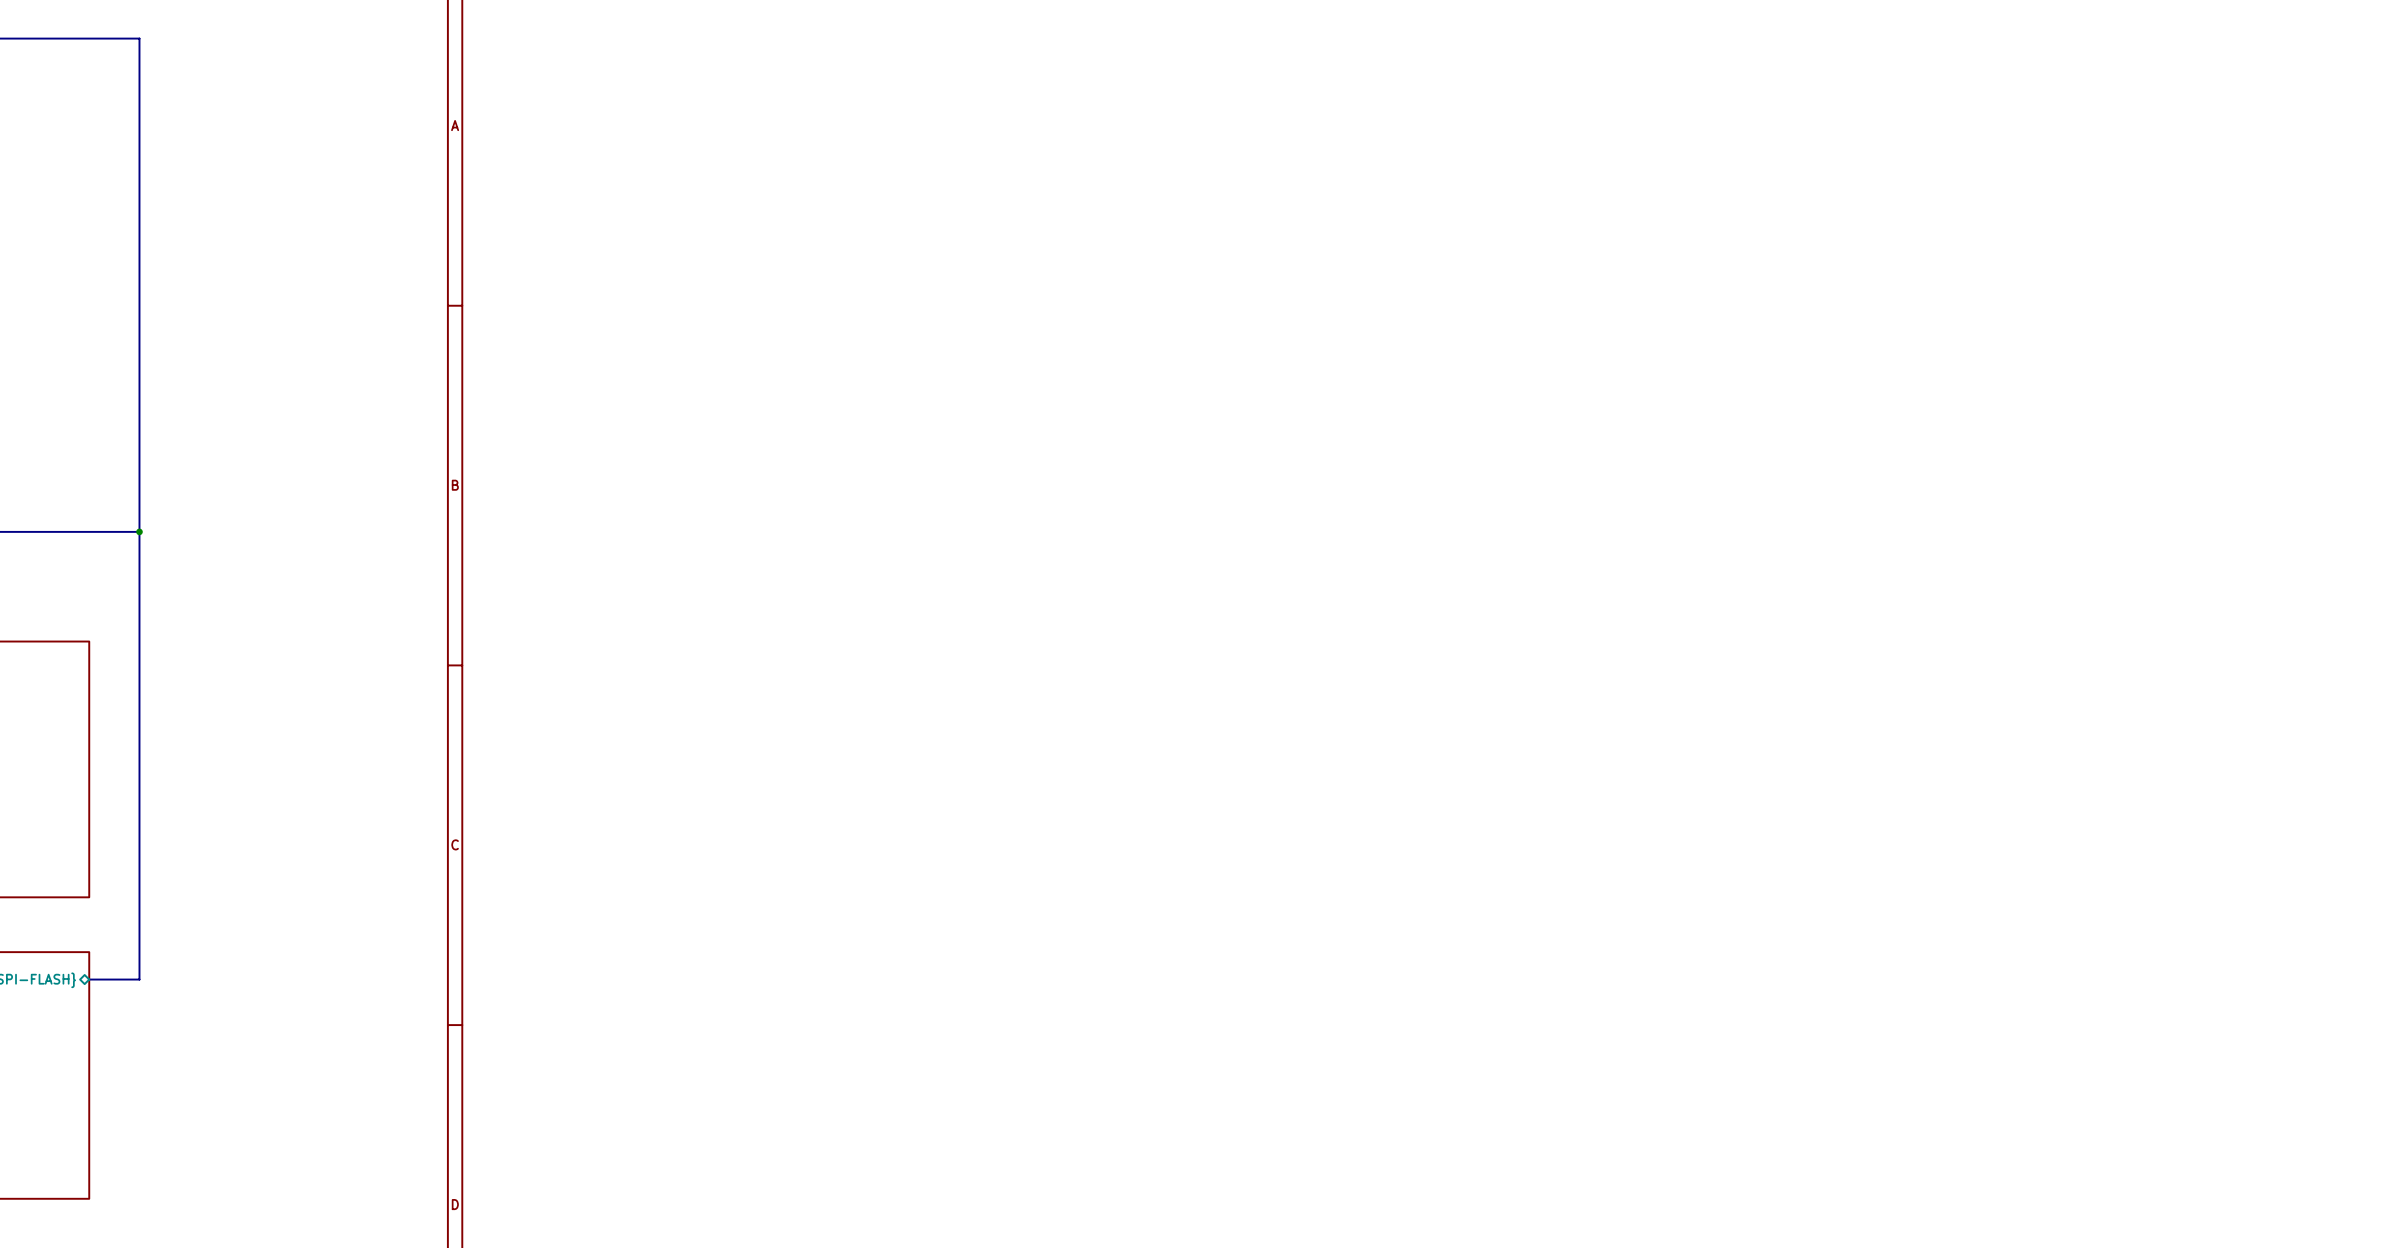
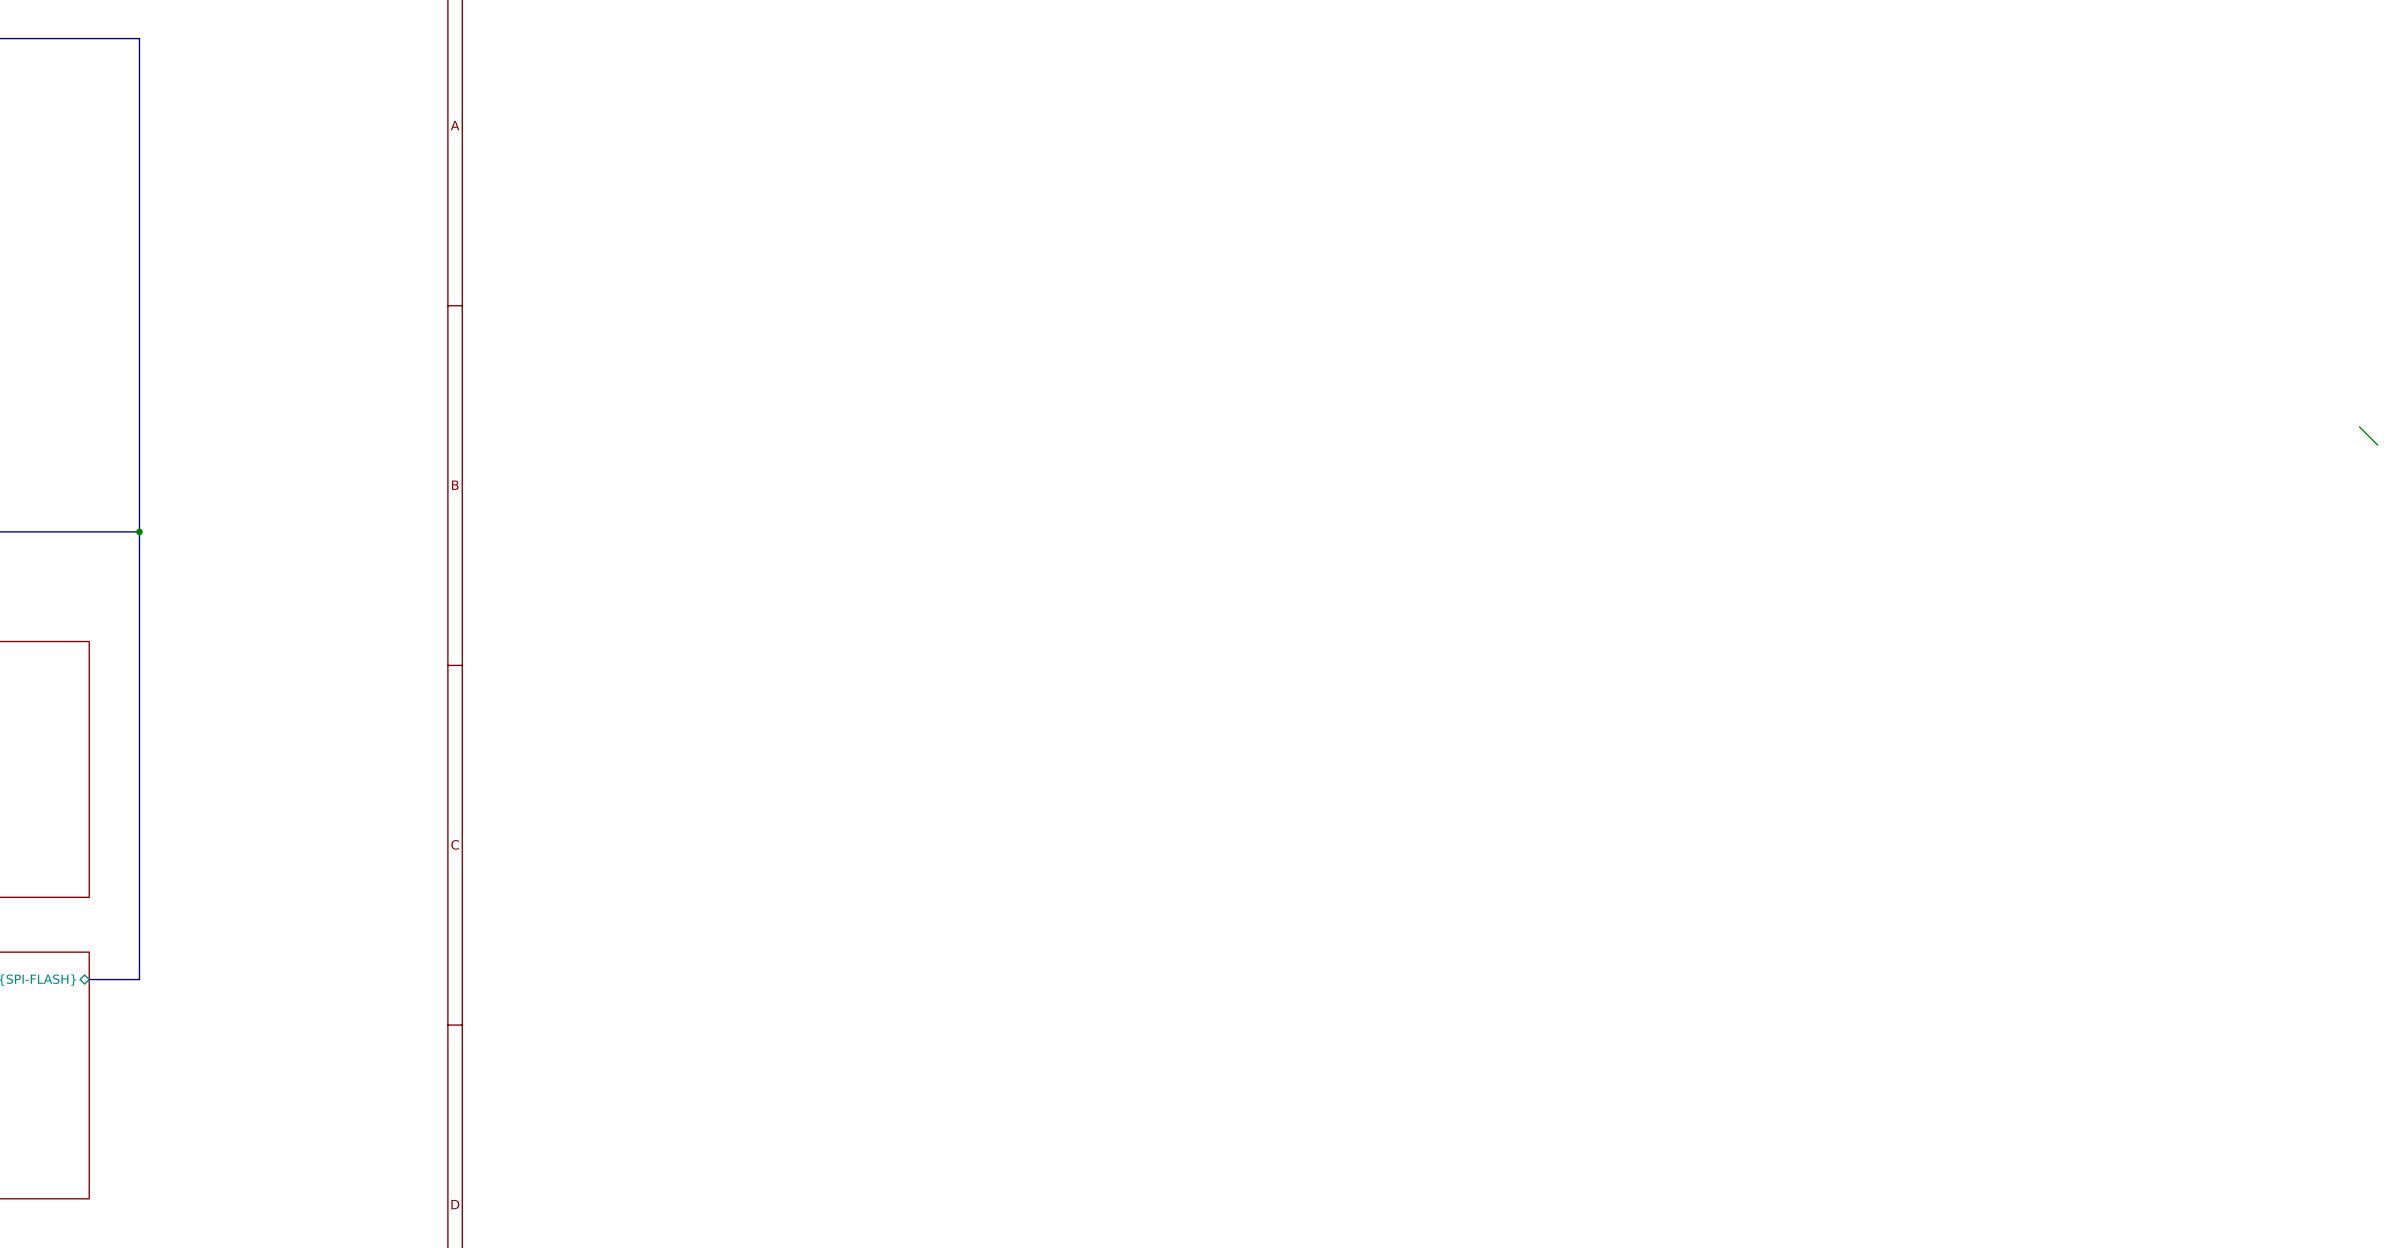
wire: none -> (2359, 426) (2377, 445)

